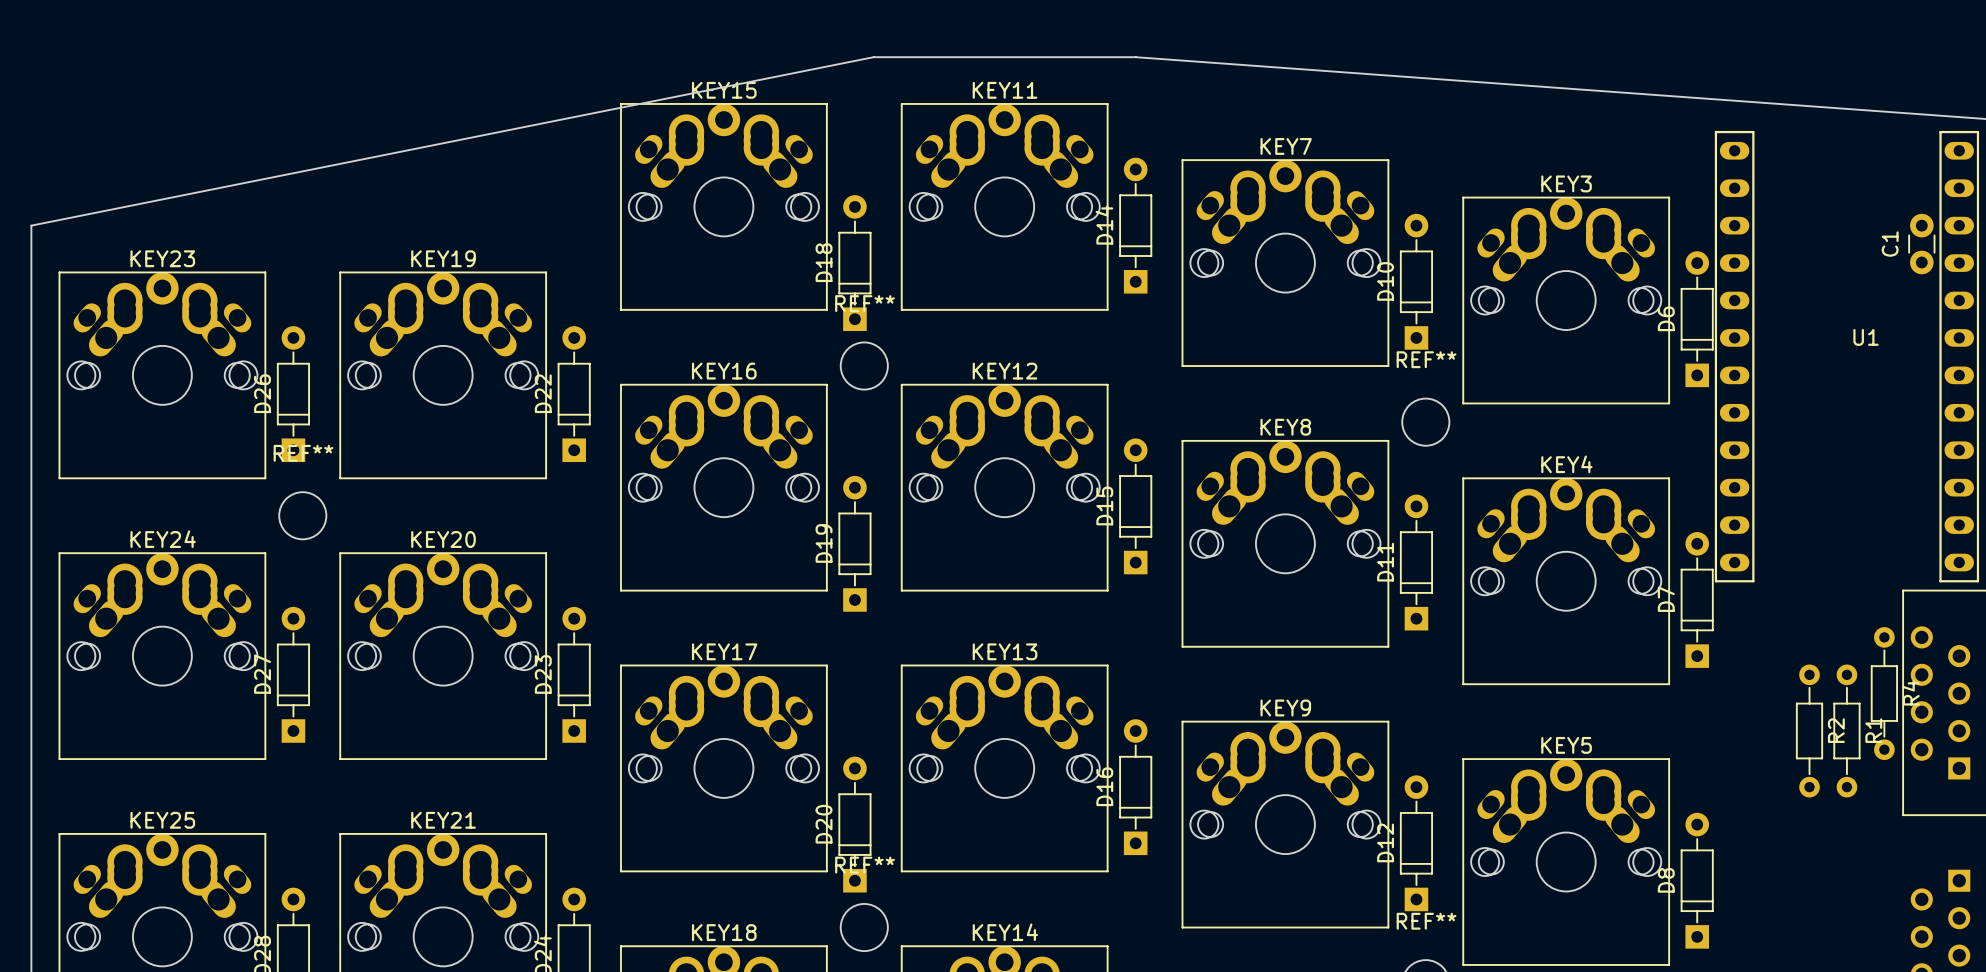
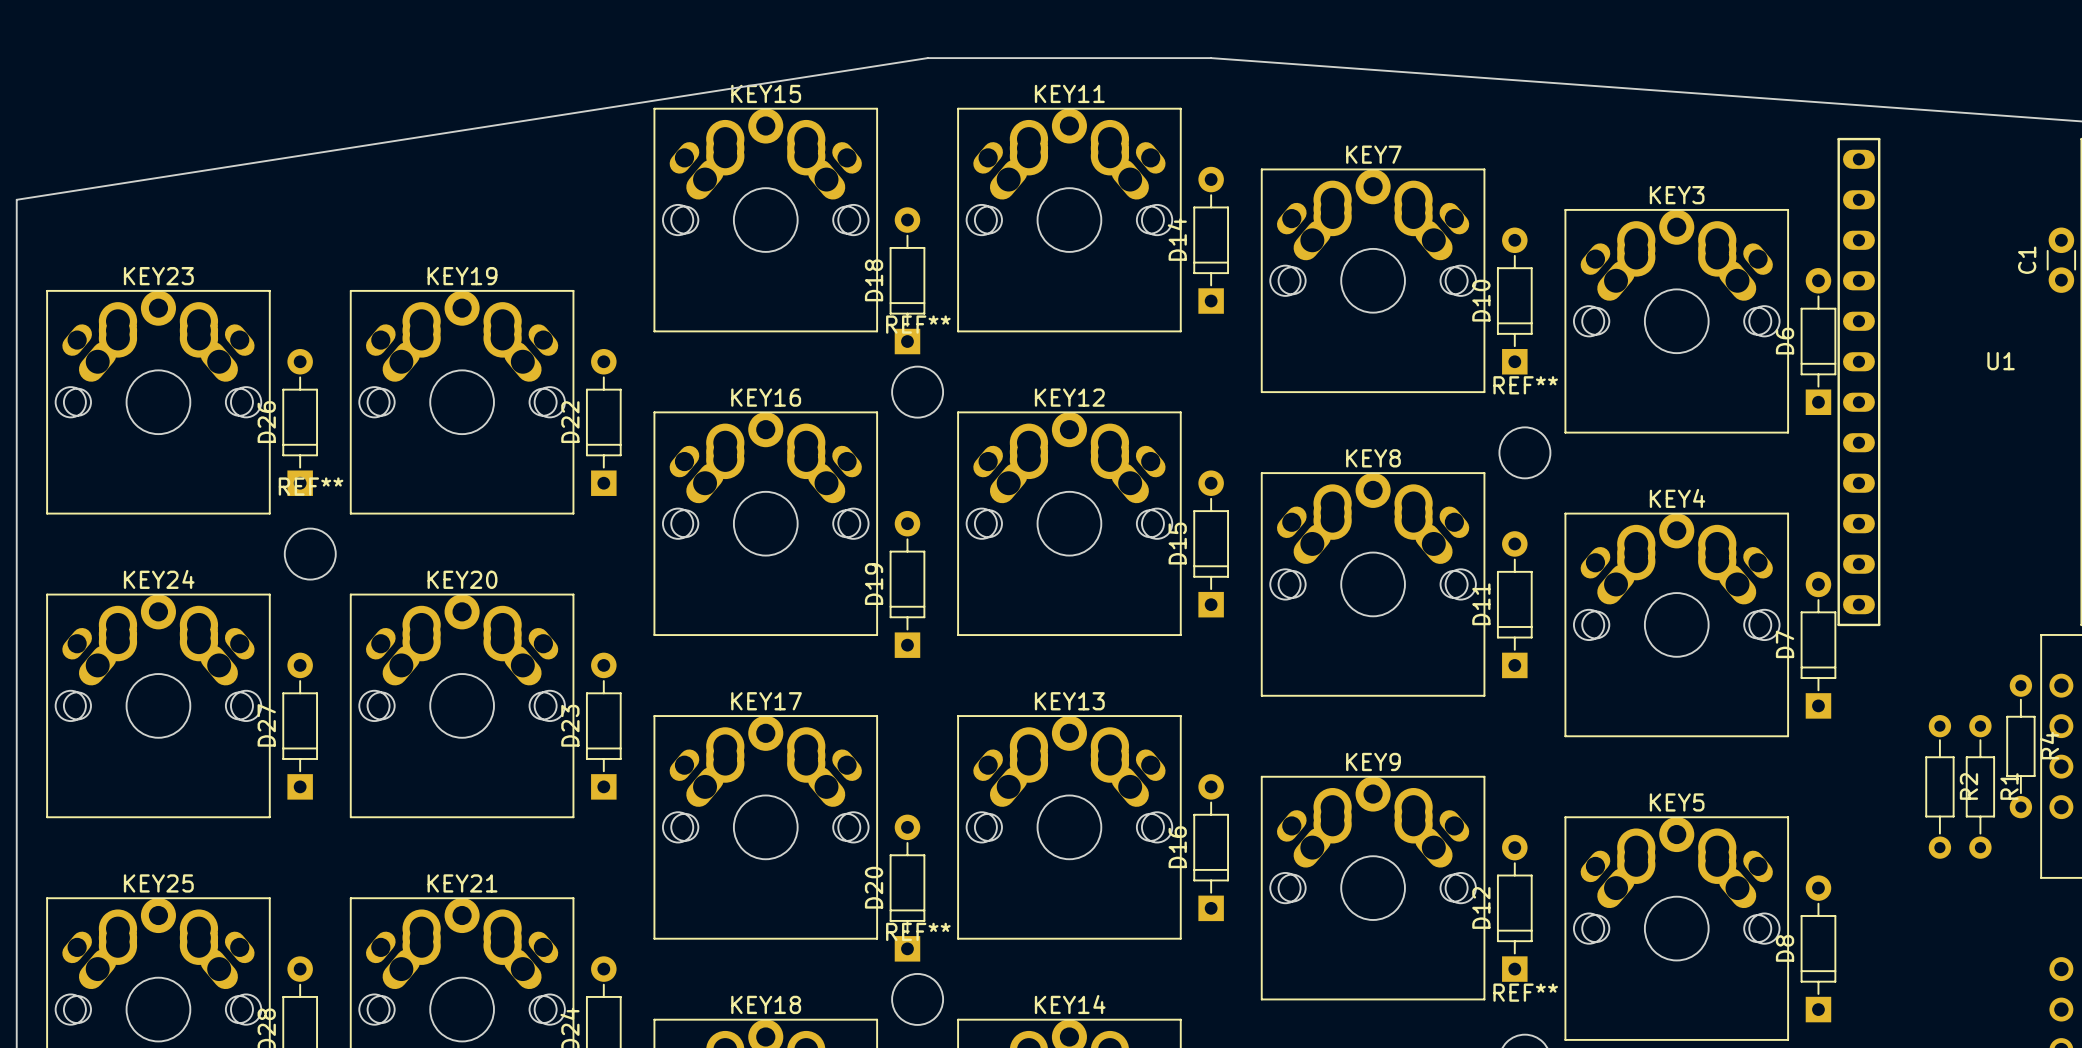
board edge: (873, 57) (31, 225) -> (927, 58) (16, 199) (16, 240)

